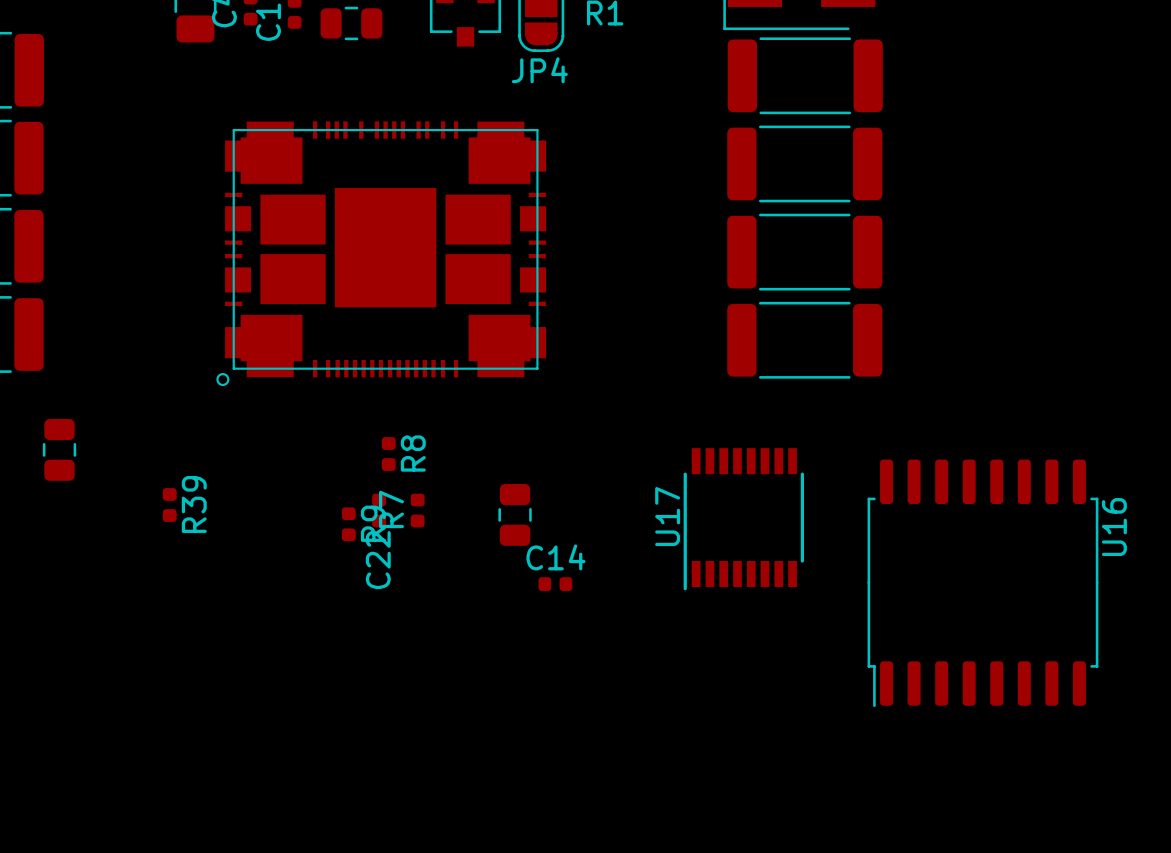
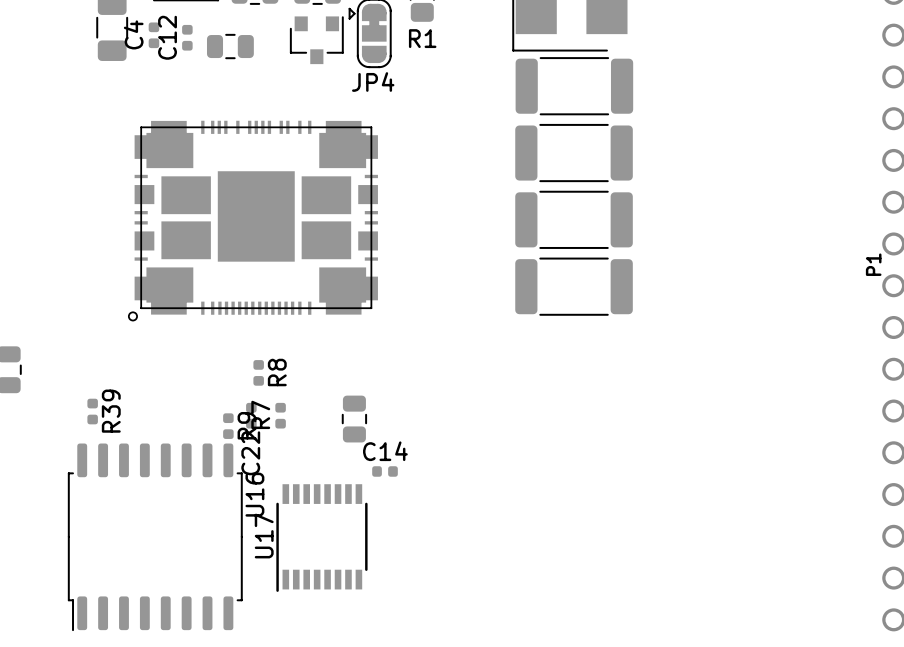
U17 position: (743, 519) -> (321, 538)
U16 position: (982, 583) -> (155, 537)

